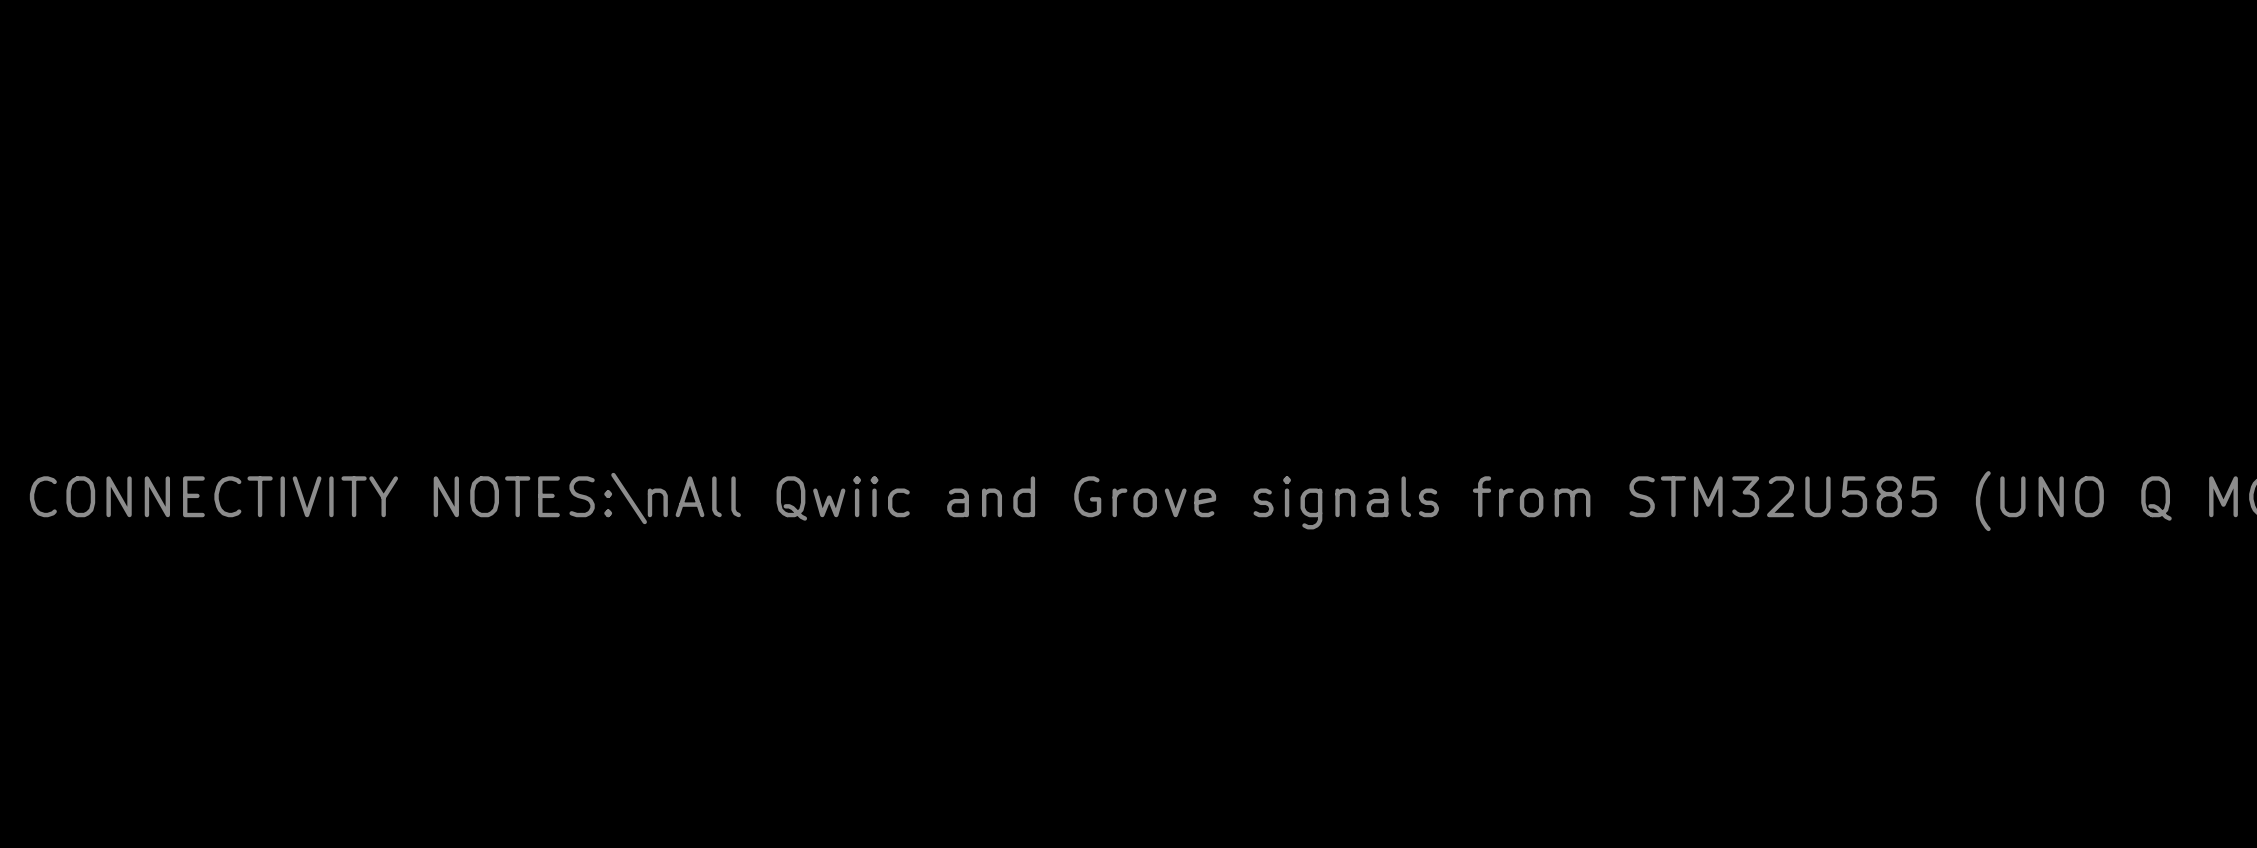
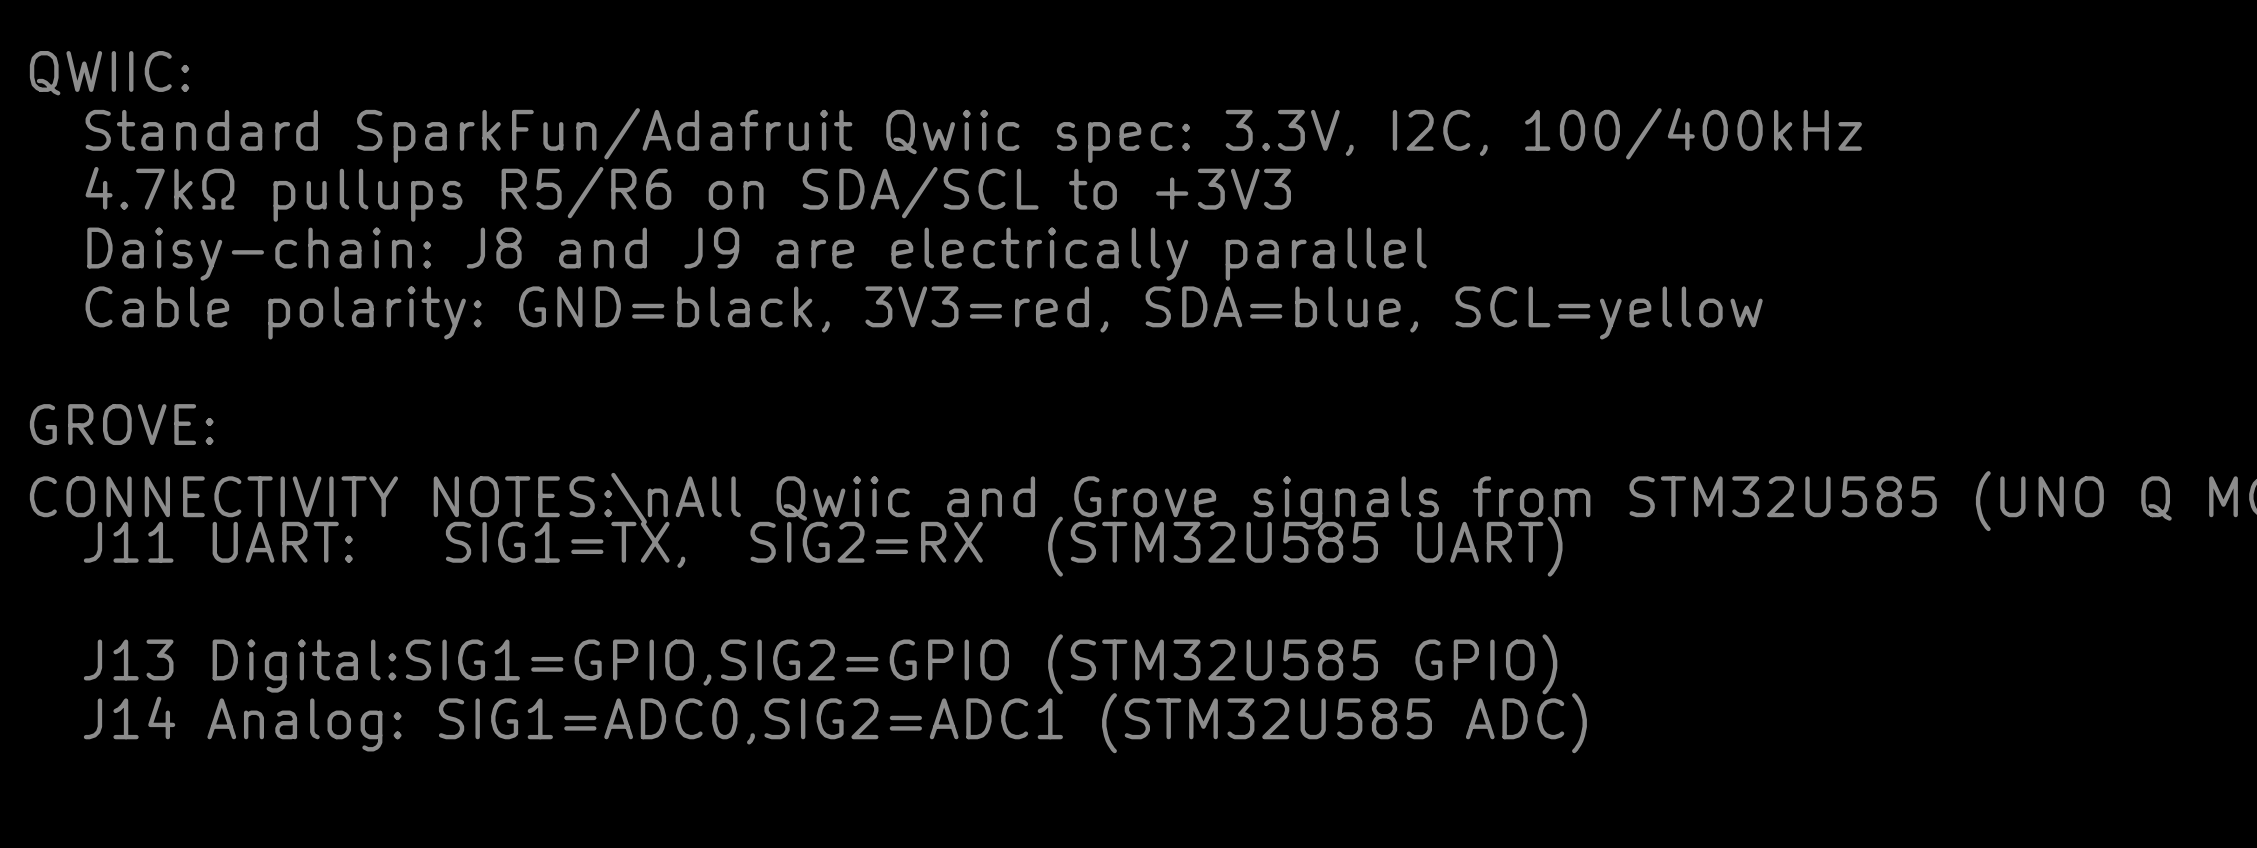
text: none -> QWIIC: (109, 73)
text: none -> Standard SparkFun/Adafruit Qwiic spec: 3.3V, I2C, 100/400kHz (973, 135)
text: none -> 4.7kΩ pullups R5/R6 on SDA/SCL to +3V3 (688, 194)
text: none -> Daisy-chain: J8 and J9 are electrically parallel (757, 254)
text: none -> Cable polarity: GND=black, 3V3=red, SDA=blue, SCL=yellow (924, 312)
text: none -> GROVE: (121, 424)
text: none -> J11 UART: SIG1=TX, SIG2=RX (STM32U585 UART) (823, 546)
text: none -> J13 Digital:SIG1=GPIO,SIG2=GPIO (STM32U585 GPIO) (820, 664)
text: none -> J14 Analog: SIG1=ADC0,SIG2=ADC1 (STM32U585 ADC) (835, 723)

